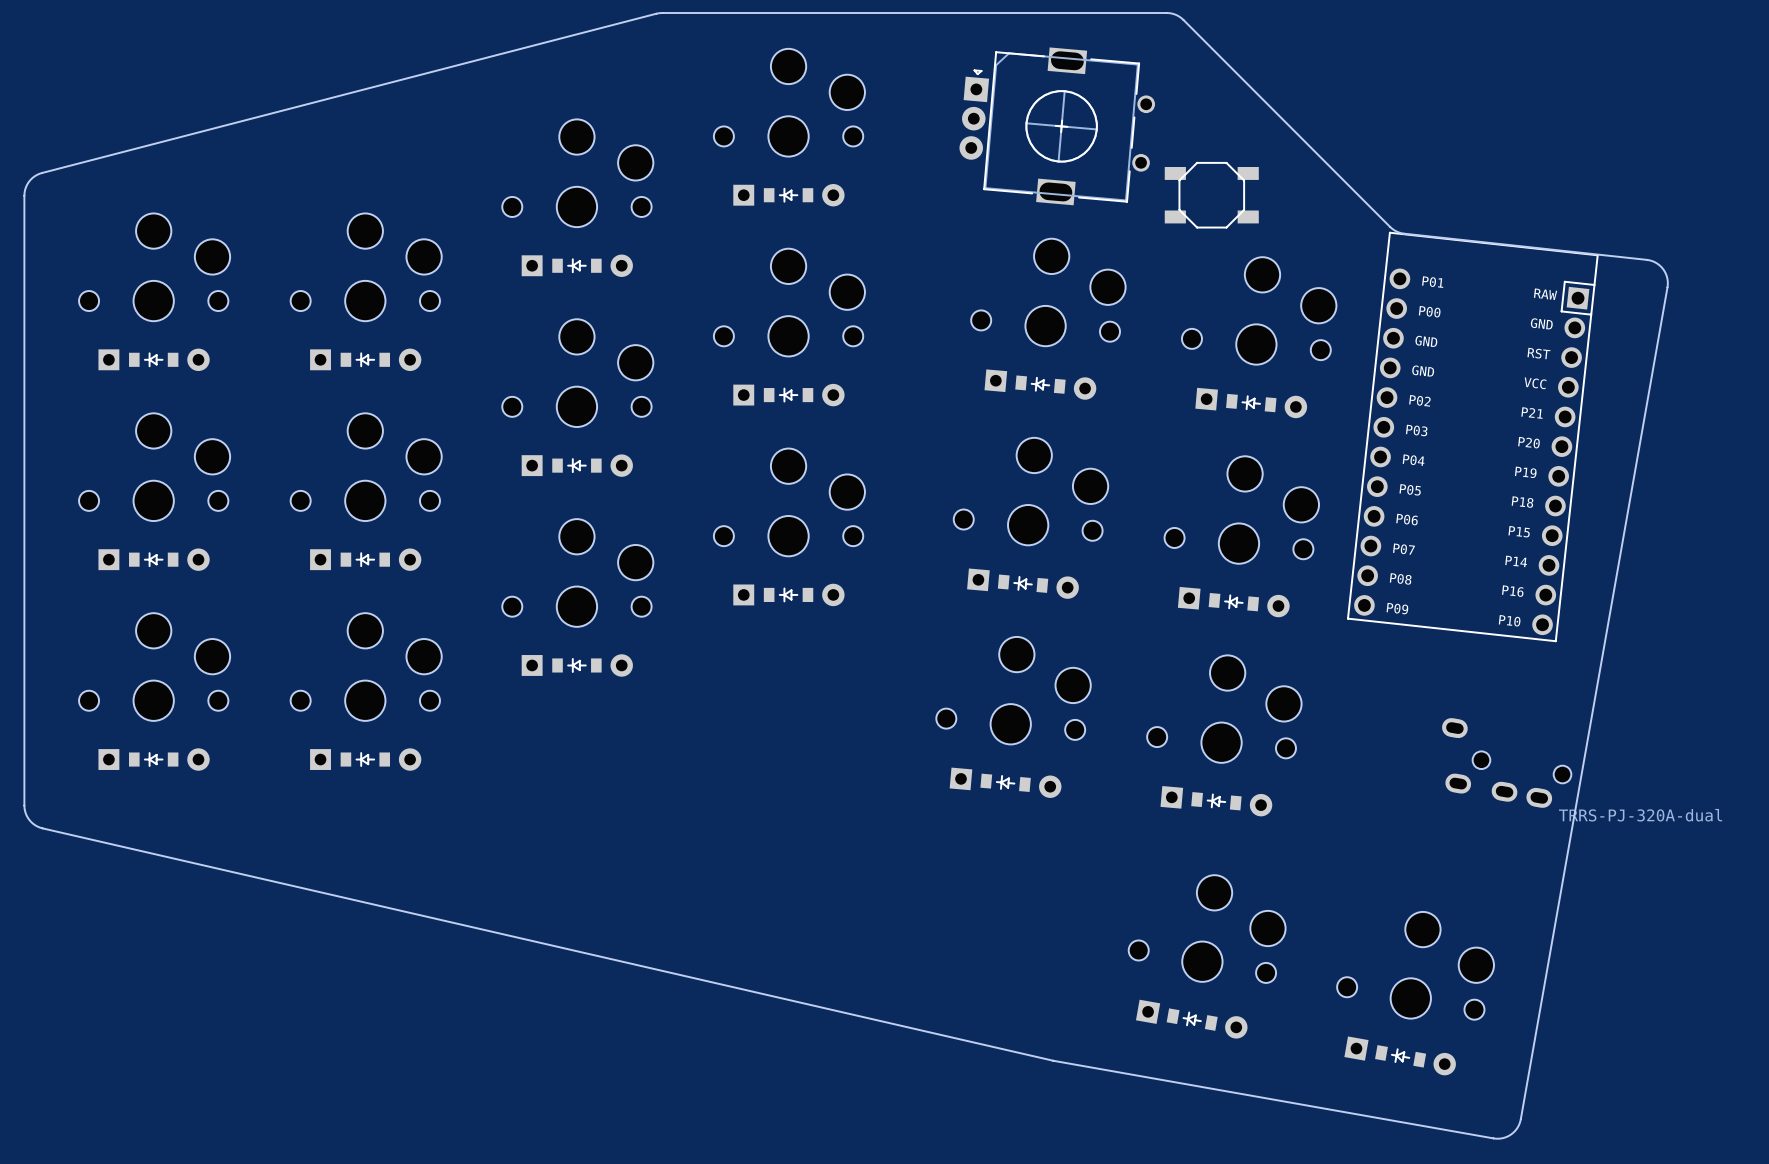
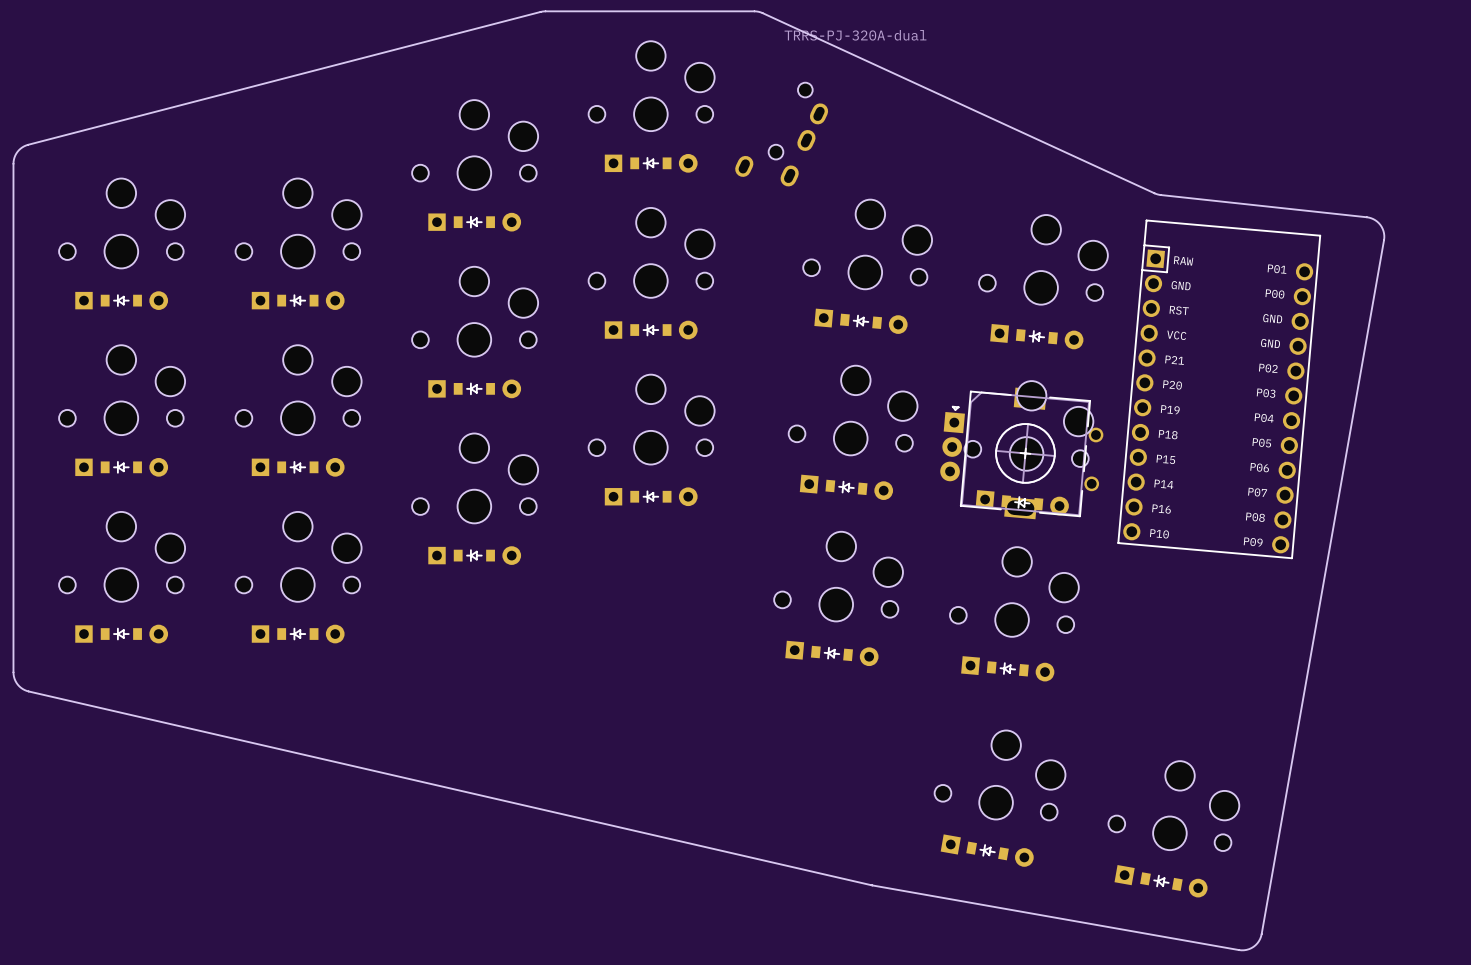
board edge: (912, 12) (1166, 12) (1175, 14) (1183, 19) (1390, 226) (1404, 233) -> (754, 11) (762, 13) (1154, 193) (1164, 195)
part: (1057, 126) -> none
part: none -> TRRS-PJ-320A-dual (781, 134)
part: (1211, 195) -> none
part: (1472, 436) -> none
part: none -> (1219, 389)
part: none -> (1021, 453)
part: TRRS-PJ-320A-dual (1506, 762) -> none

